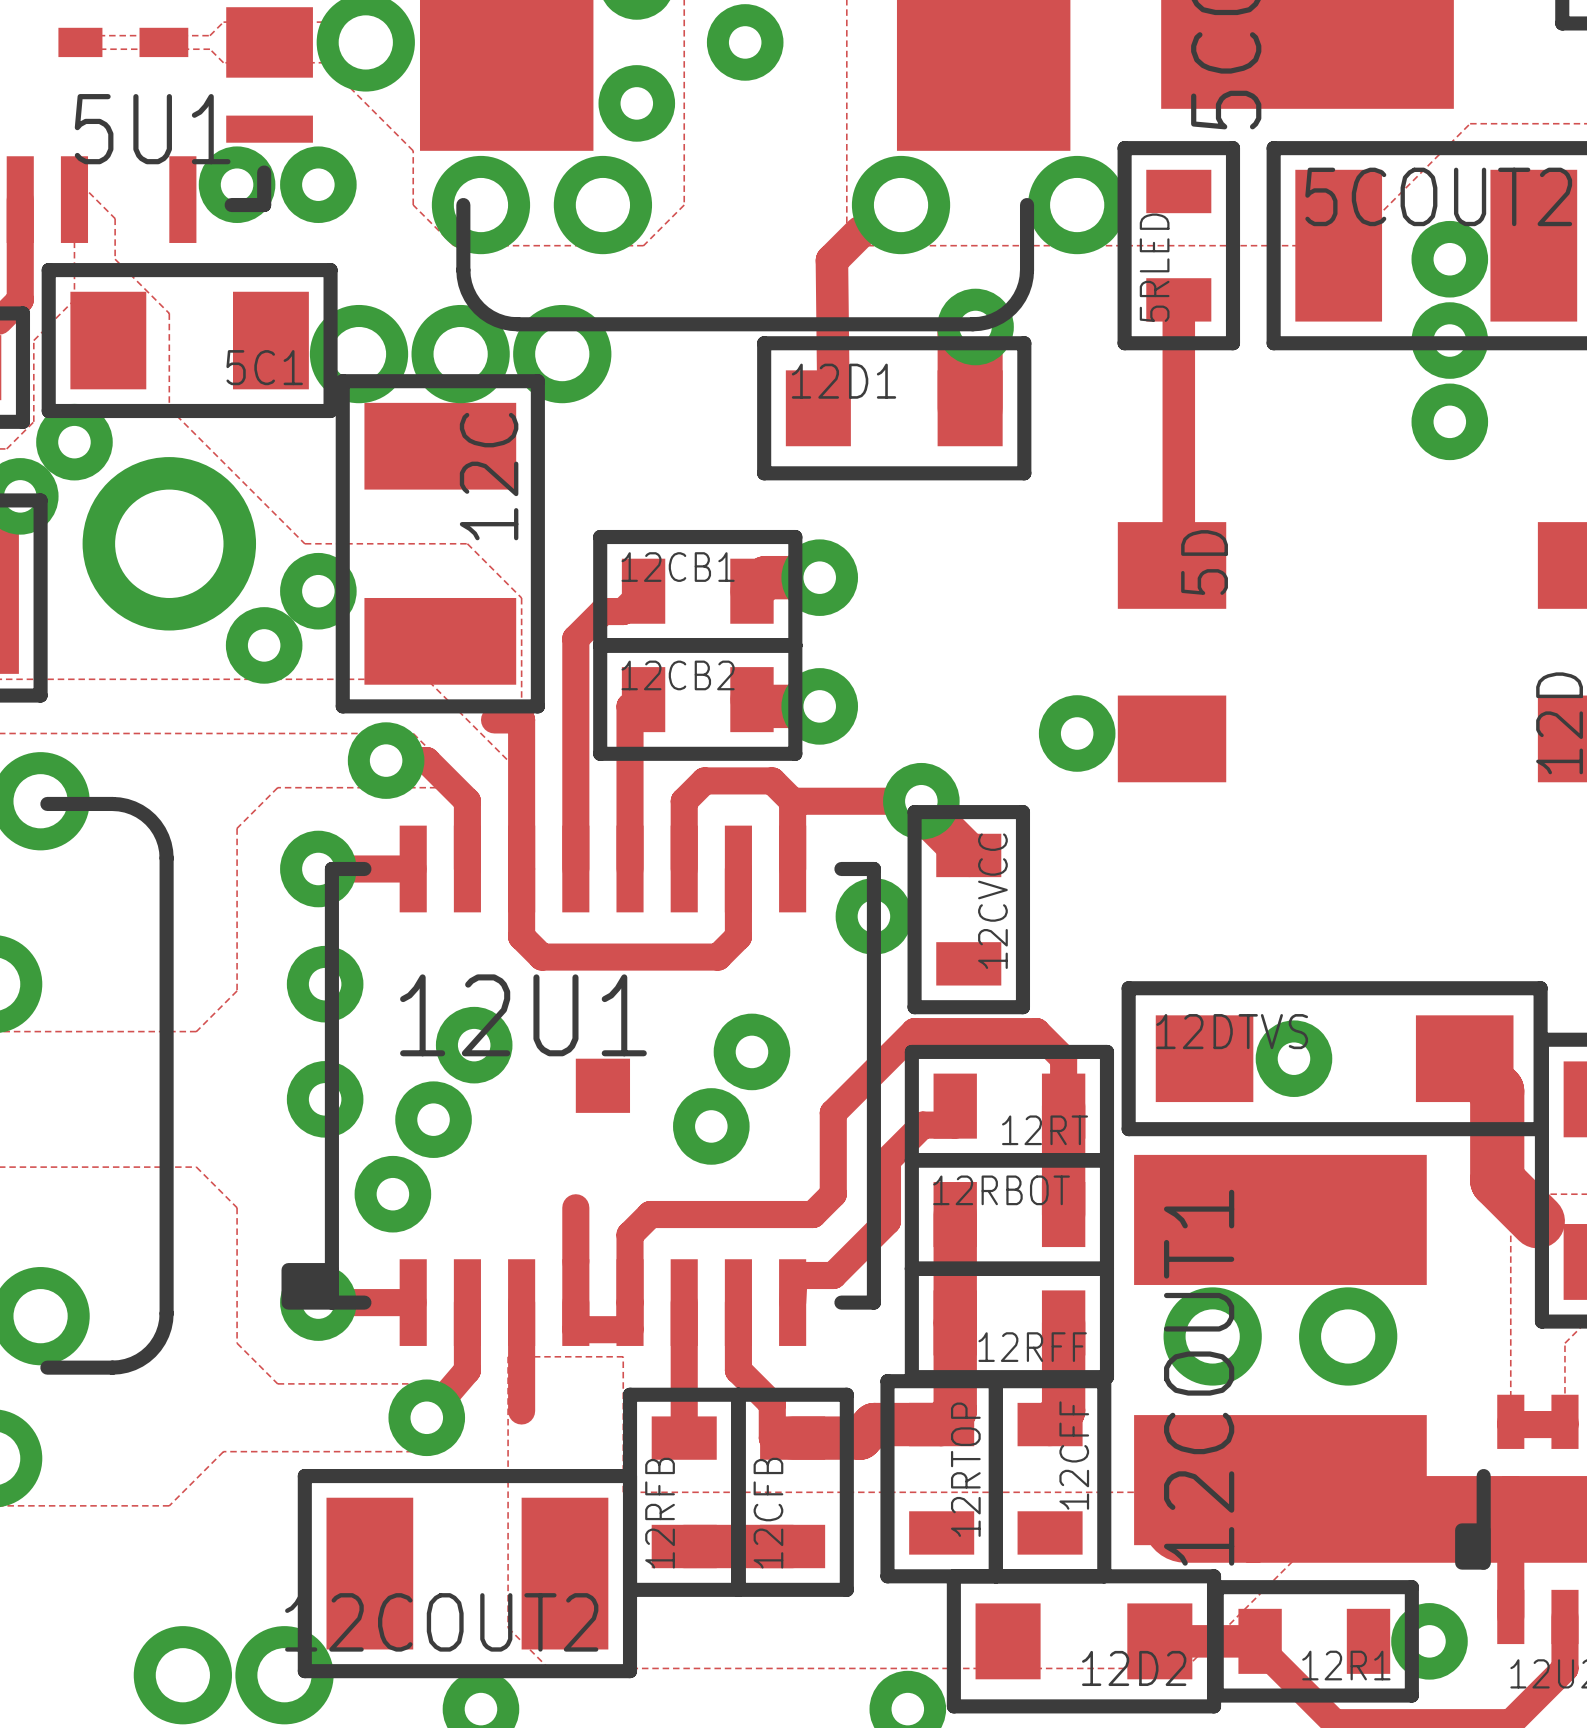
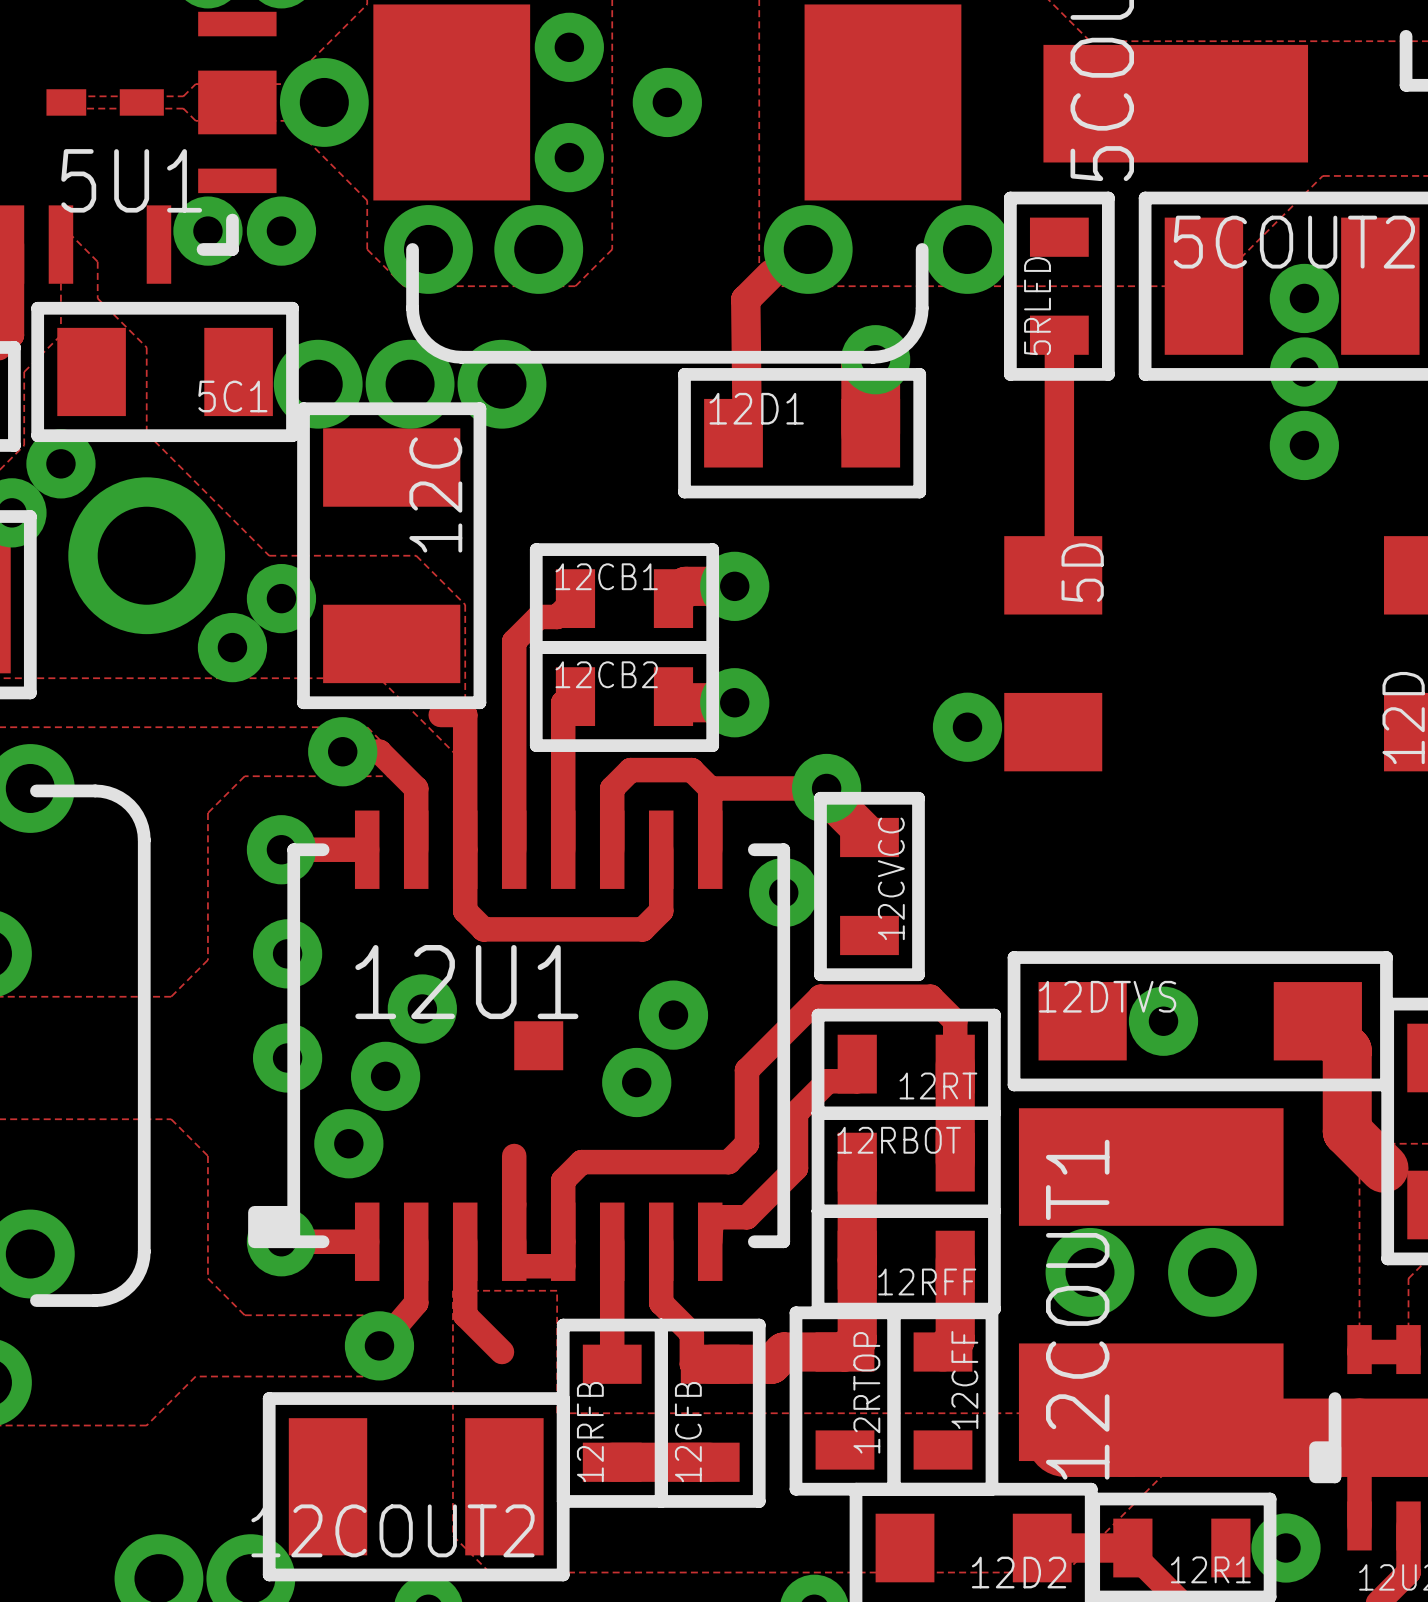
track: (521, 1383) (521, 1411) -> (465, 1315) (501, 1352)

